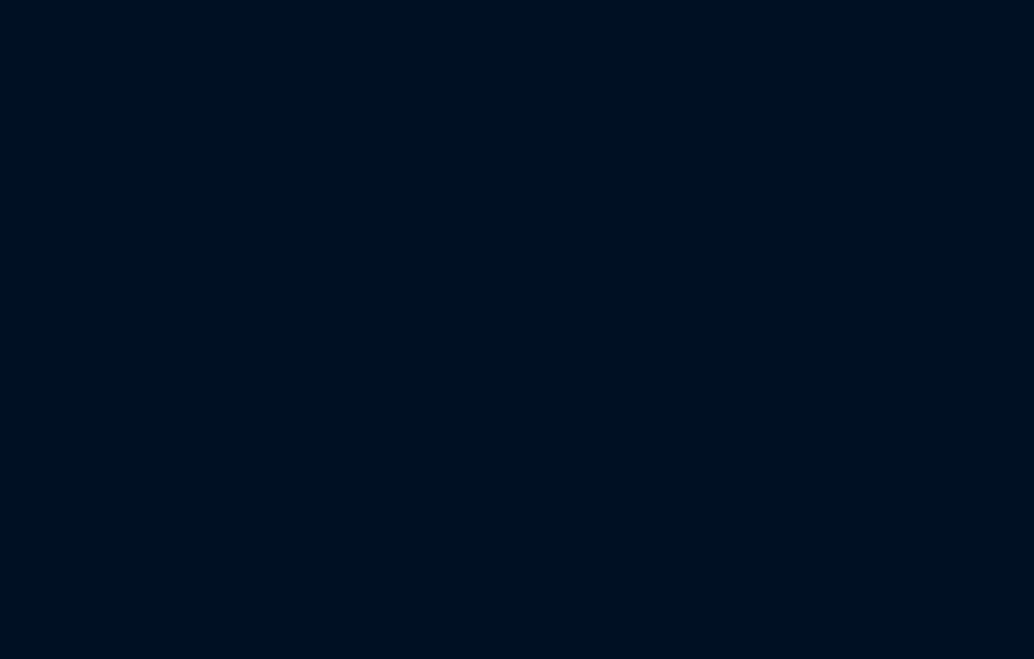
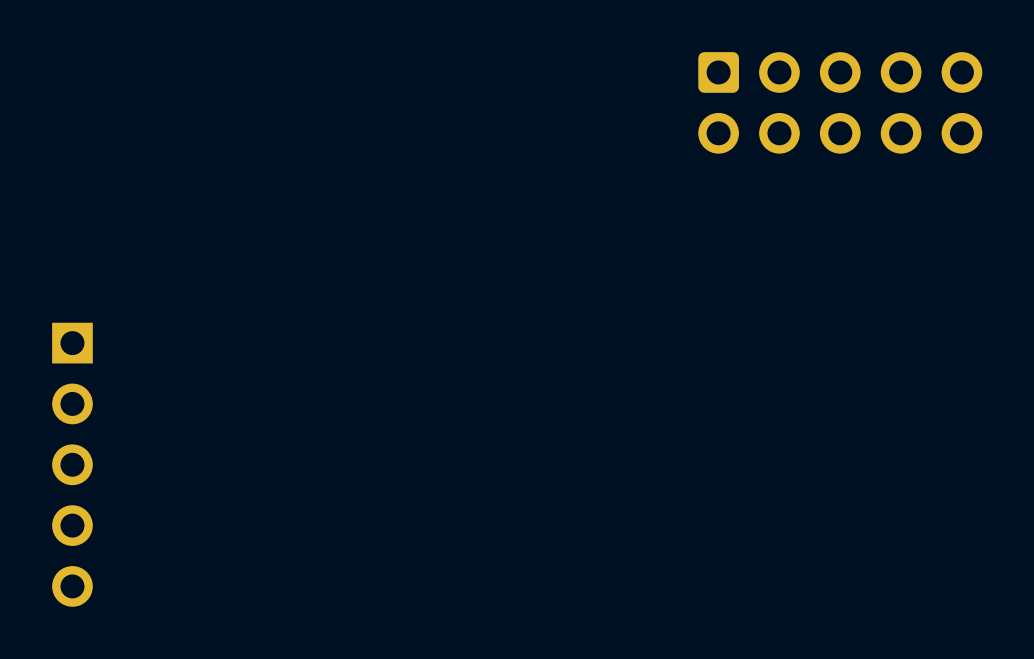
part: none -> (840, 102)
part: none -> (72, 464)

